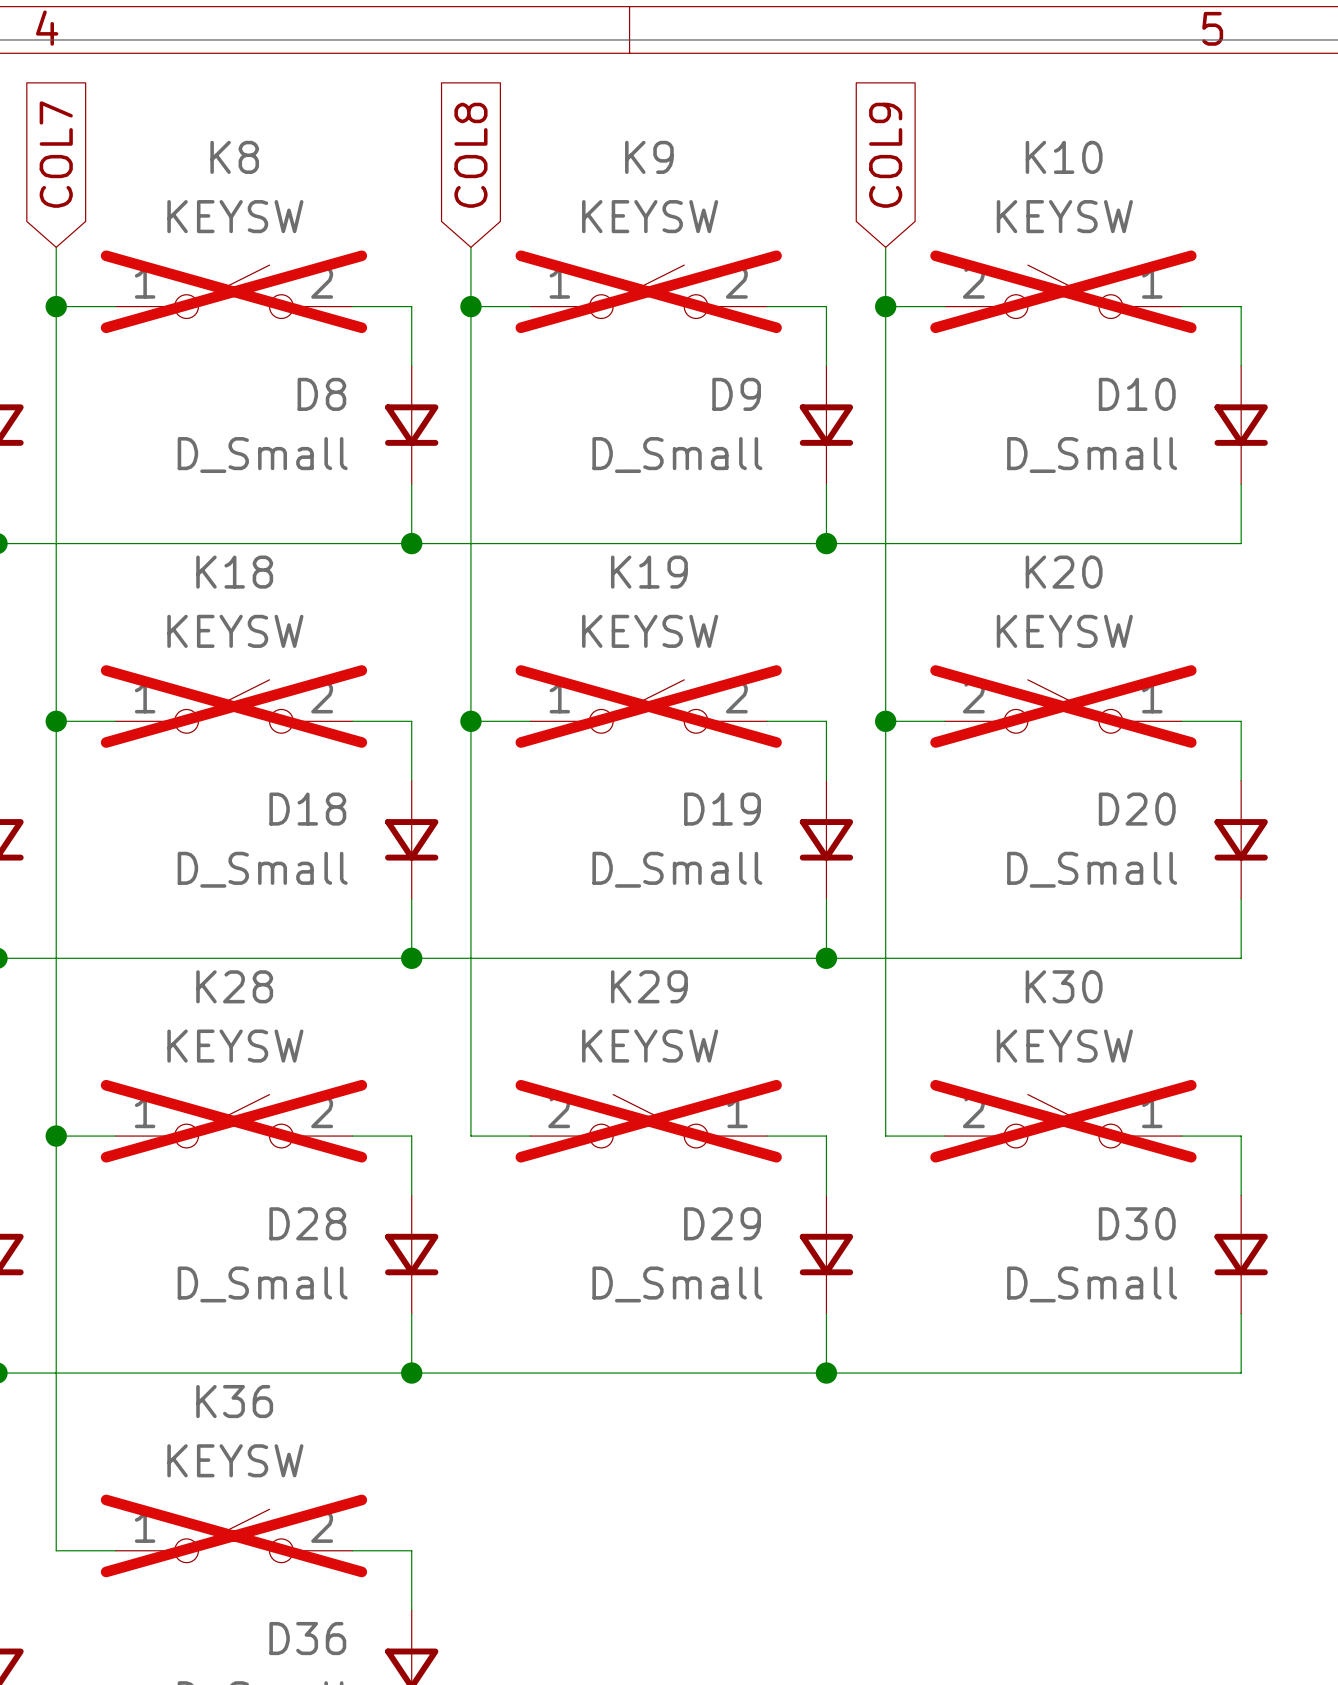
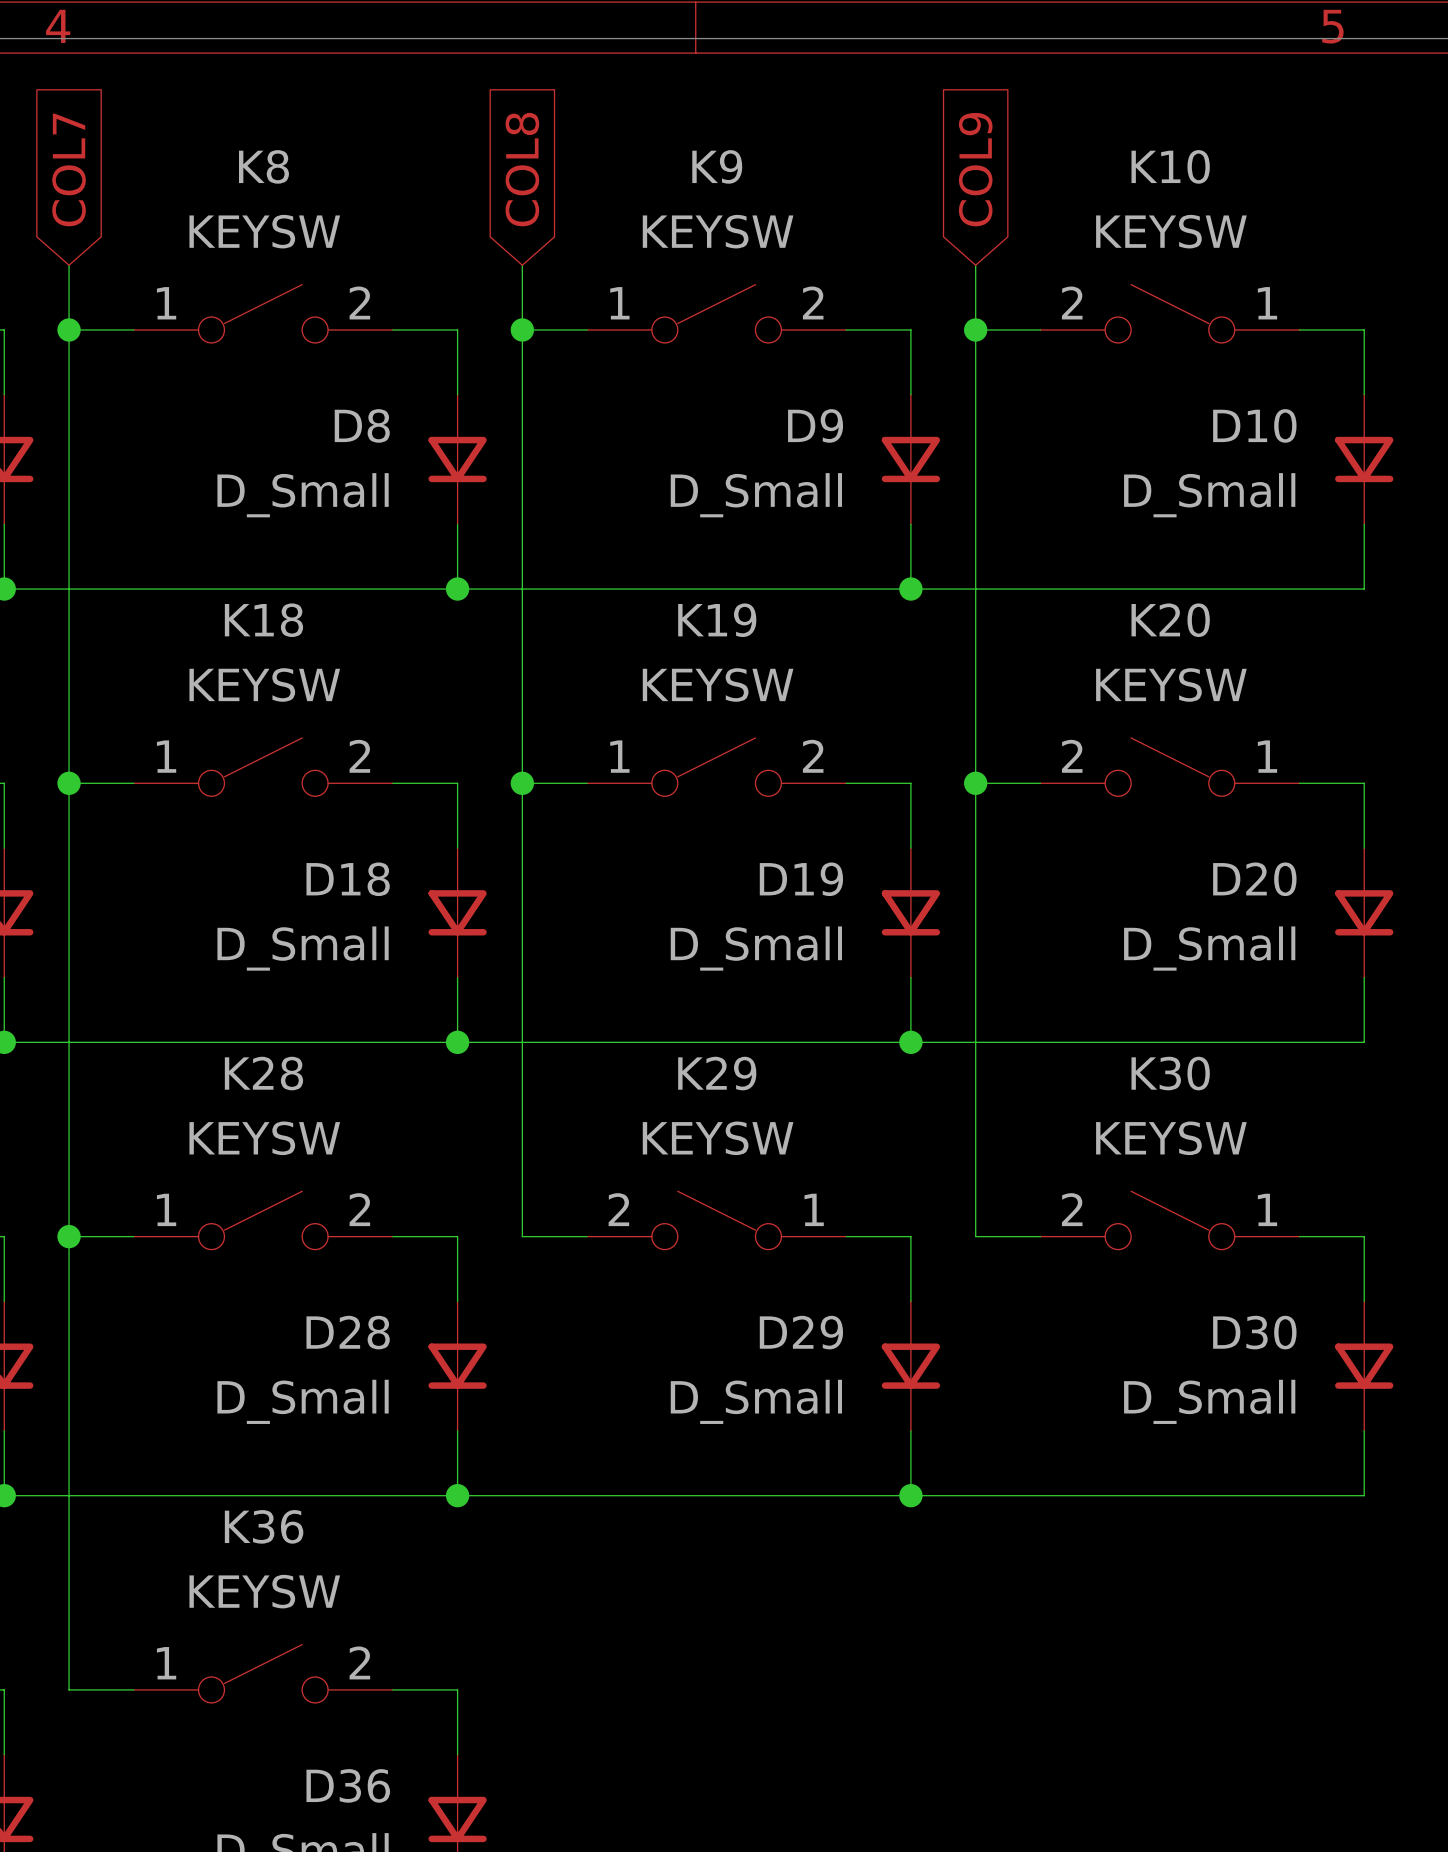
K8 do-not-place cross: (233, 291) -> none
K9 do-not-place cross: (648, 291) -> none
K10 do-not-place cross: (1063, 291) -> none
K18 do-not-place cross: (233, 706) -> none
K19 do-not-place cross: (648, 706) -> none
K20 do-not-place cross: (1063, 706) -> none
K28 do-not-place cross: (233, 1121) -> none
K29 do-not-place cross: (648, 1121) -> none
K30 do-not-place cross: (1063, 1121) -> none
K36 do-not-place cross: (233, 1535) -> none

